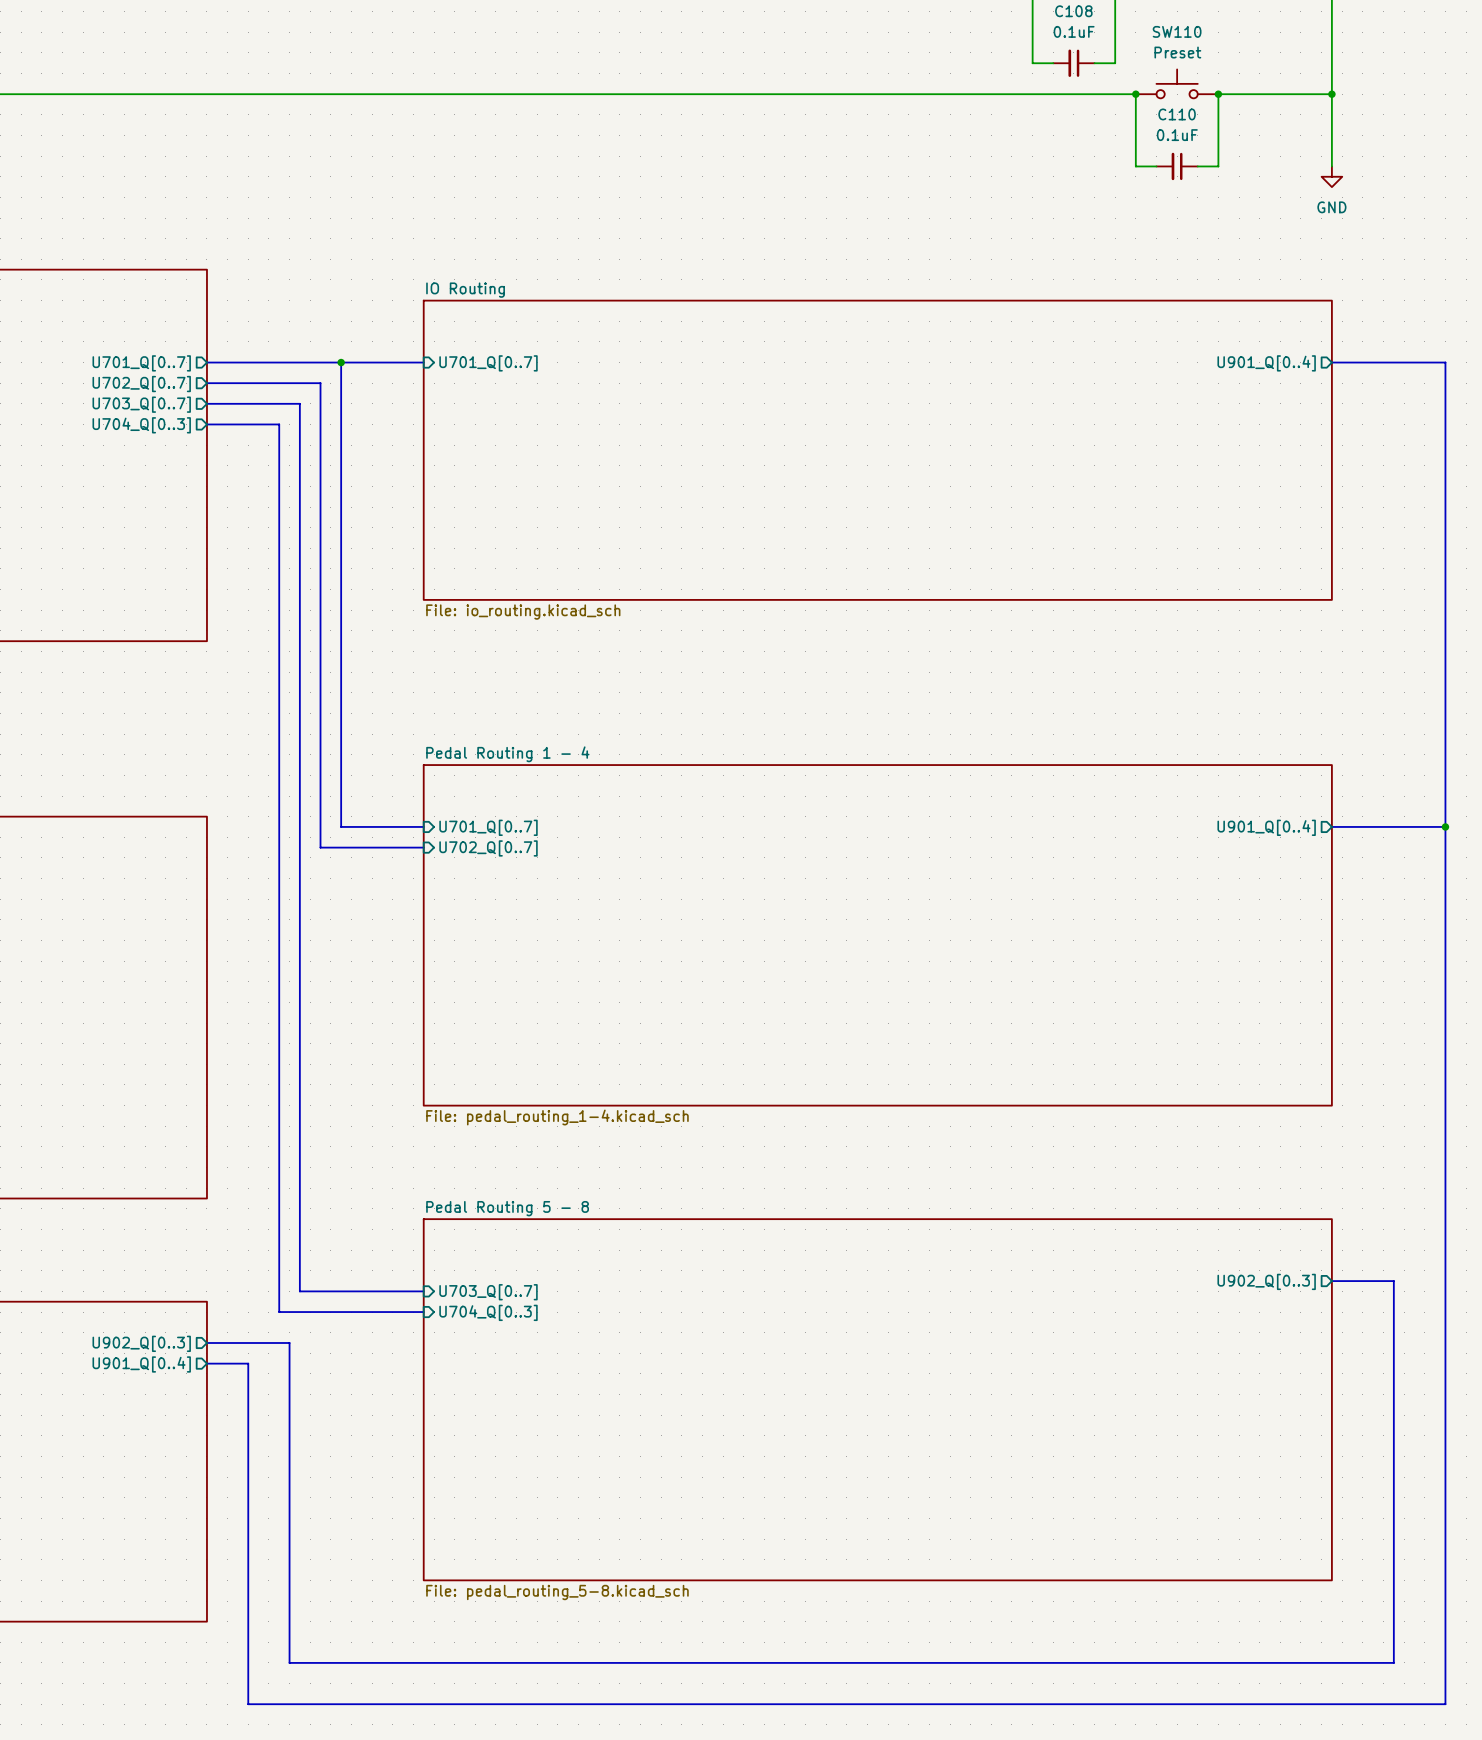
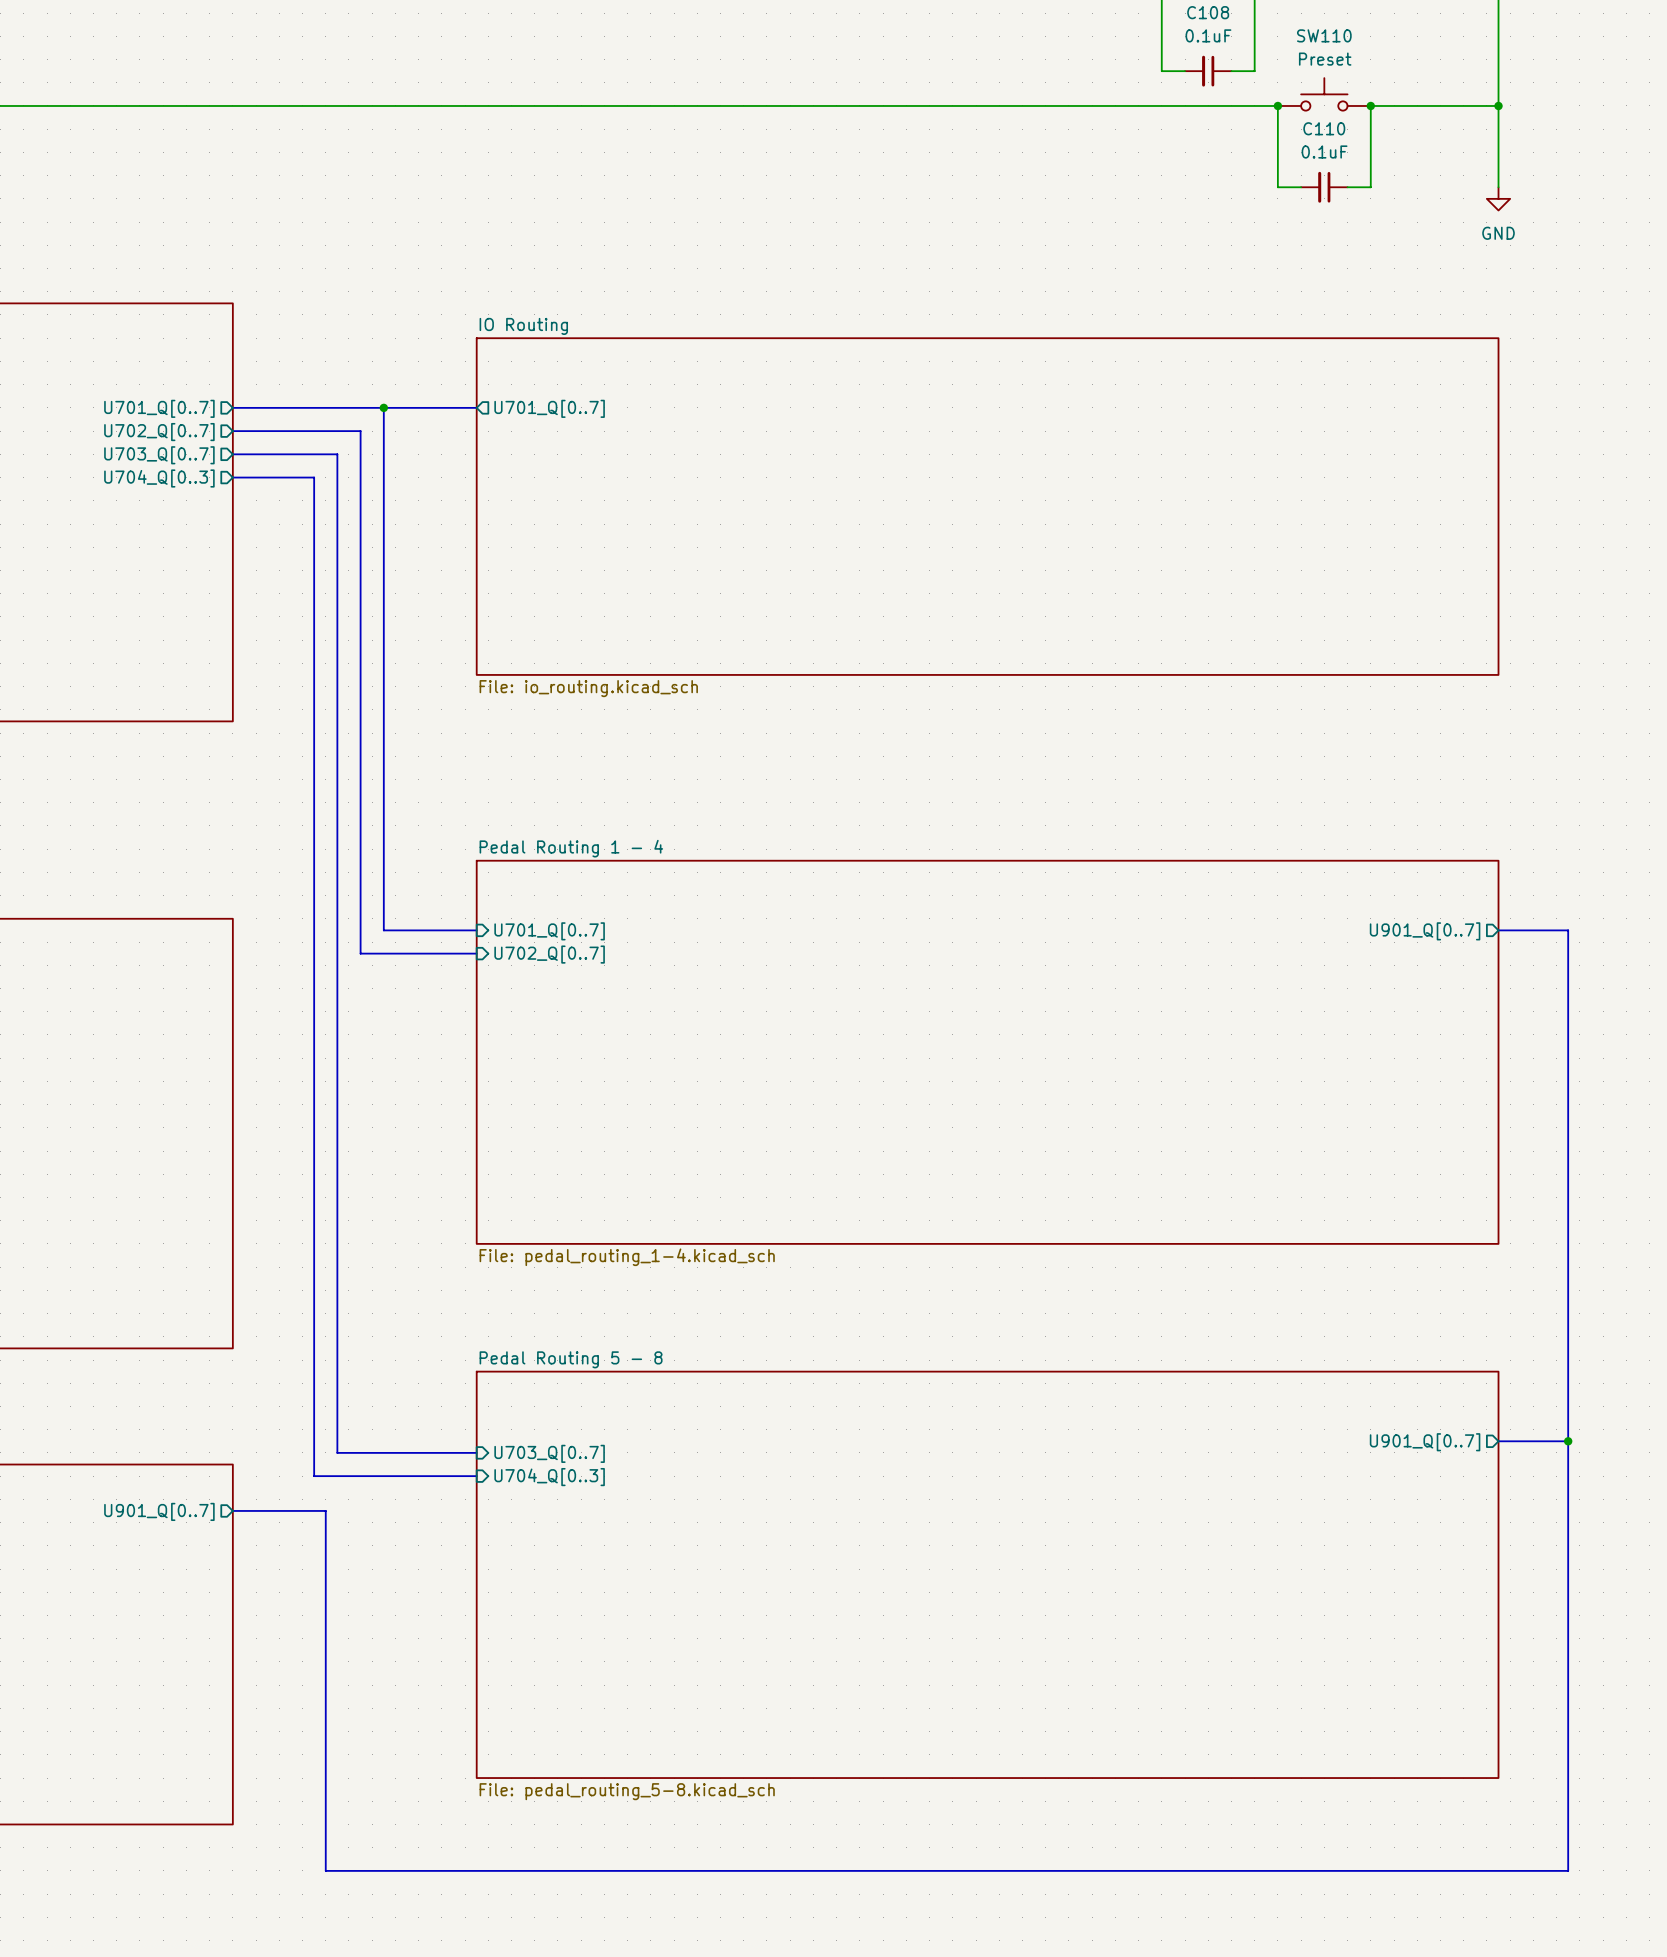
bus: (1331, 362) (1445, 362) (1445, 1704) (248, 1704) (248, 1363) (206, 1363) -> none
sheet pin shape: input (488, 363) -> output (549, 408)
sheet pin: U901_Q[0..4] (1266, 363) -> none
bus: (1393, 826) (1445, 826) -> (1568, 930) (1568, 1441)
junction: (1445, 826) -> none
sheet pin: U901_Q[0..4] (1266, 827) -> U901_Q[0..7] (1425, 931)
sheet pin: U902_Q[0..3] (1266, 1281) -> U901_Q[0..7] (1425, 1442)
junction: none -> (1568, 1441)
sheet pin: U902_Q[0..3] (141, 1343) -> U901_Q[0..7] (159, 1511)
sheet pin: U901_Q[0..4] (141, 1364) -> none

